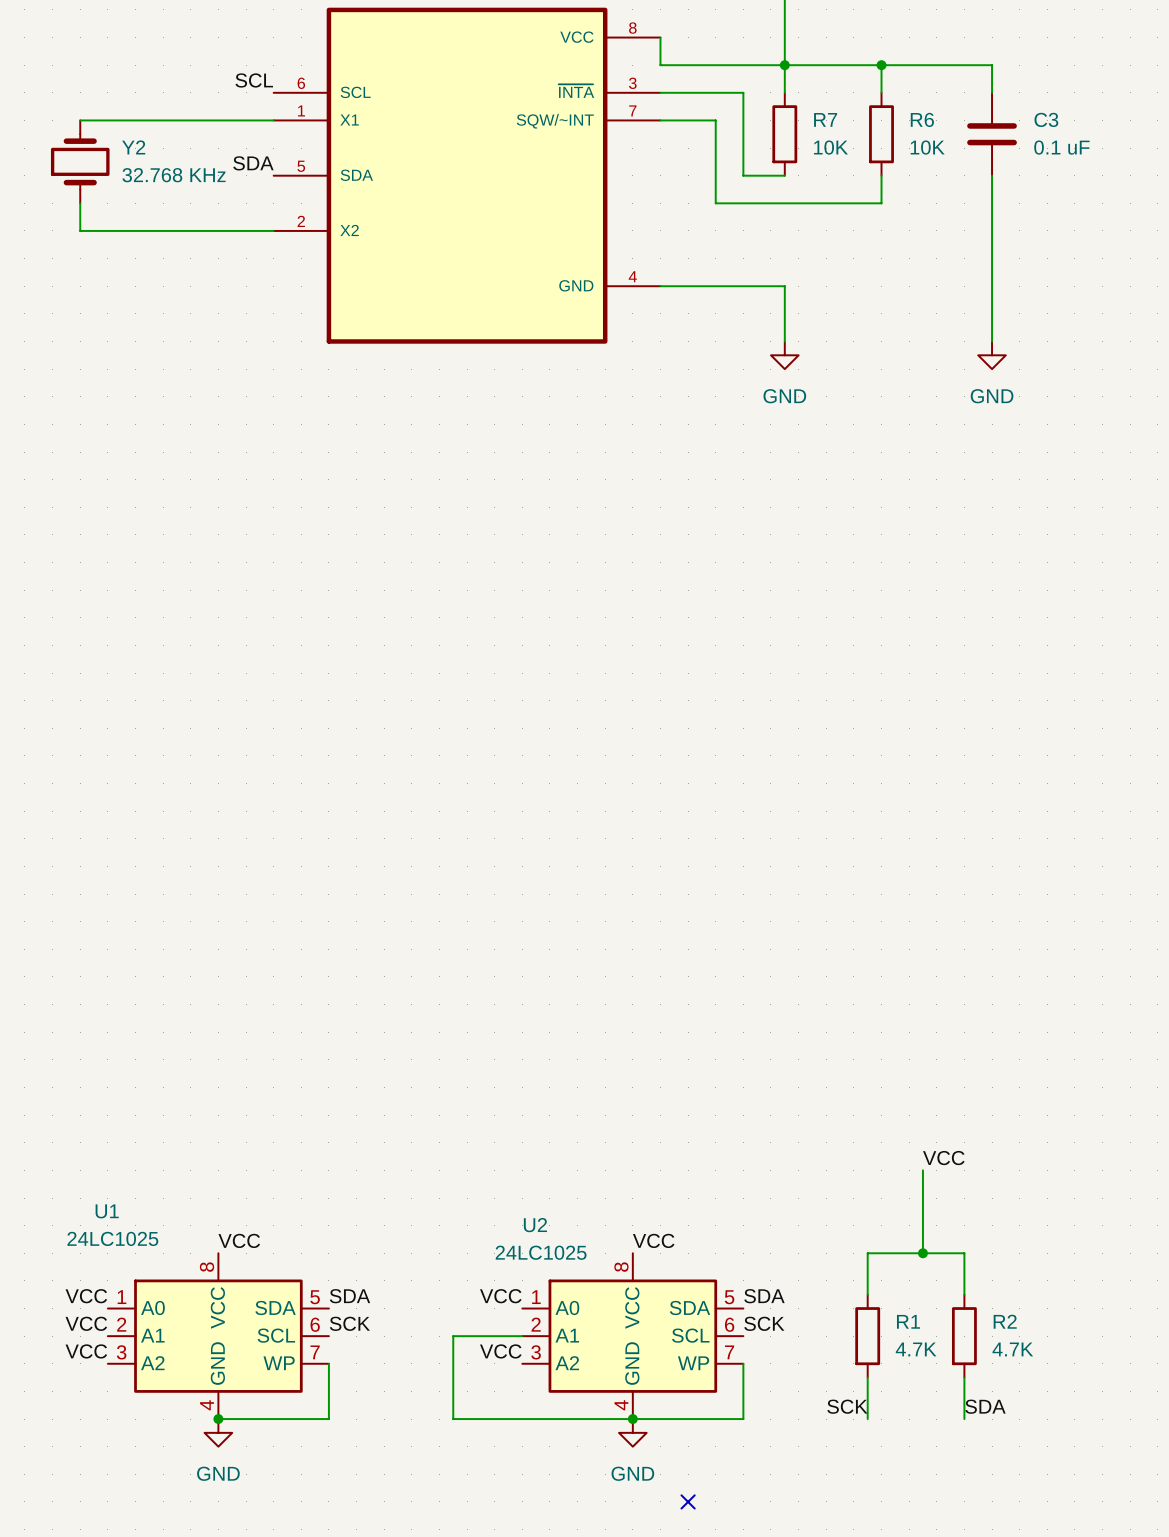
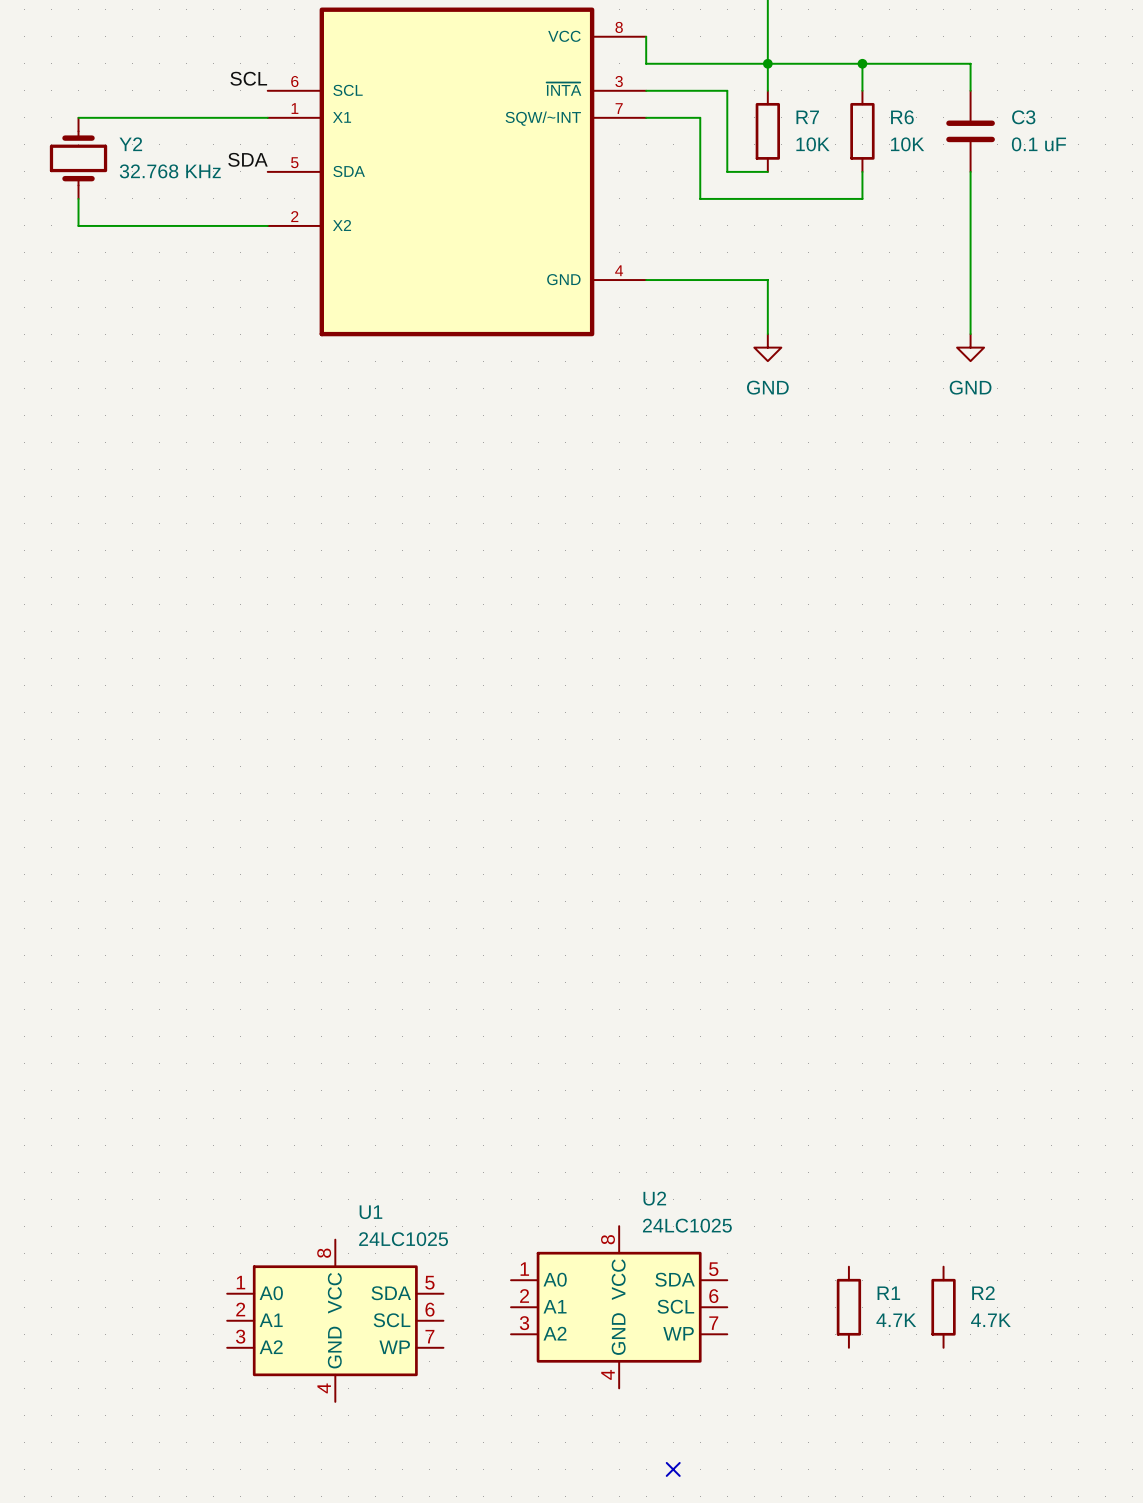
label: VCC (943, 1158) -> none
wire: (922, 1170) (922, 1253) -> none
U1 name position: U1 (107, 1211) -> U1 (370, 1212)
U2 name position: U2 (535, 1225) -> U2 (654, 1198)
U1 value position: 24LC1025 (112, 1238) -> 24LC1025 (403, 1239)
label: VCC (239, 1240) -> none
label: VCC (653, 1240) -> none
U2 value position: 24LC1025 (541, 1252) -> 24LC1025 (687, 1225)
junction: (922, 1253) -> none
wire: (867, 1294) (867, 1253) (964, 1253) (964, 1294) -> none
label: VCC (86, 1296) -> none
label: SDA (350, 1296) -> none
label: VCC (500, 1296) -> none
label: SDA (764, 1296) -> none
label: VCC (86, 1323) -> none
label: SCK (349, 1323) -> none
label: SCK (764, 1323) -> none
U1 position: (218, 1336) -> (335, 1320)
wire: (522, 1336) (453, 1336) (453, 1419) (743, 1419) (743, 1363) -> none
label: VCC (86, 1351) -> none
label: VCC (500, 1351) -> none
wire: (328, 1363) (328, 1419) (218, 1419) -> none
wire: (867, 1377) (867, 1419) -> none
wire: (964, 1377) (964, 1419) -> none
label: SCK (847, 1406) -> none
label: SDA (985, 1406) -> none
junction: (218, 1419) -> none
junction: (632, 1419) -> none
power symbol: GND (218, 1432) -> none
power symbol: GND (632, 1432) -> none

